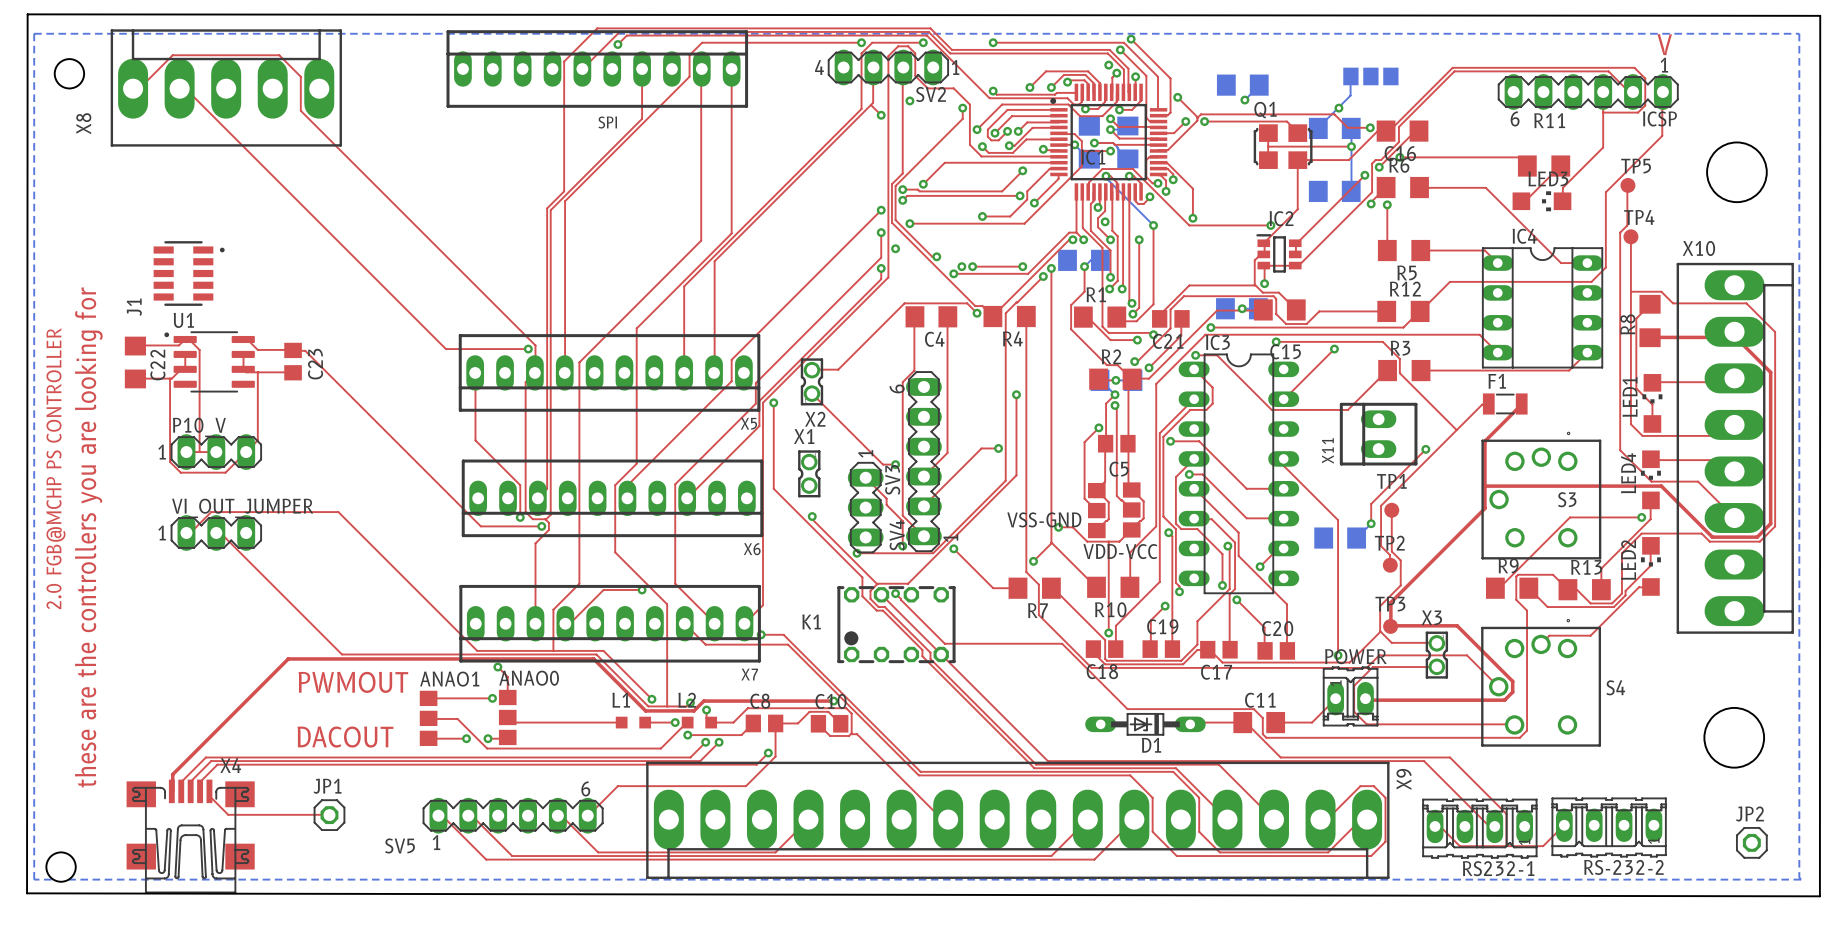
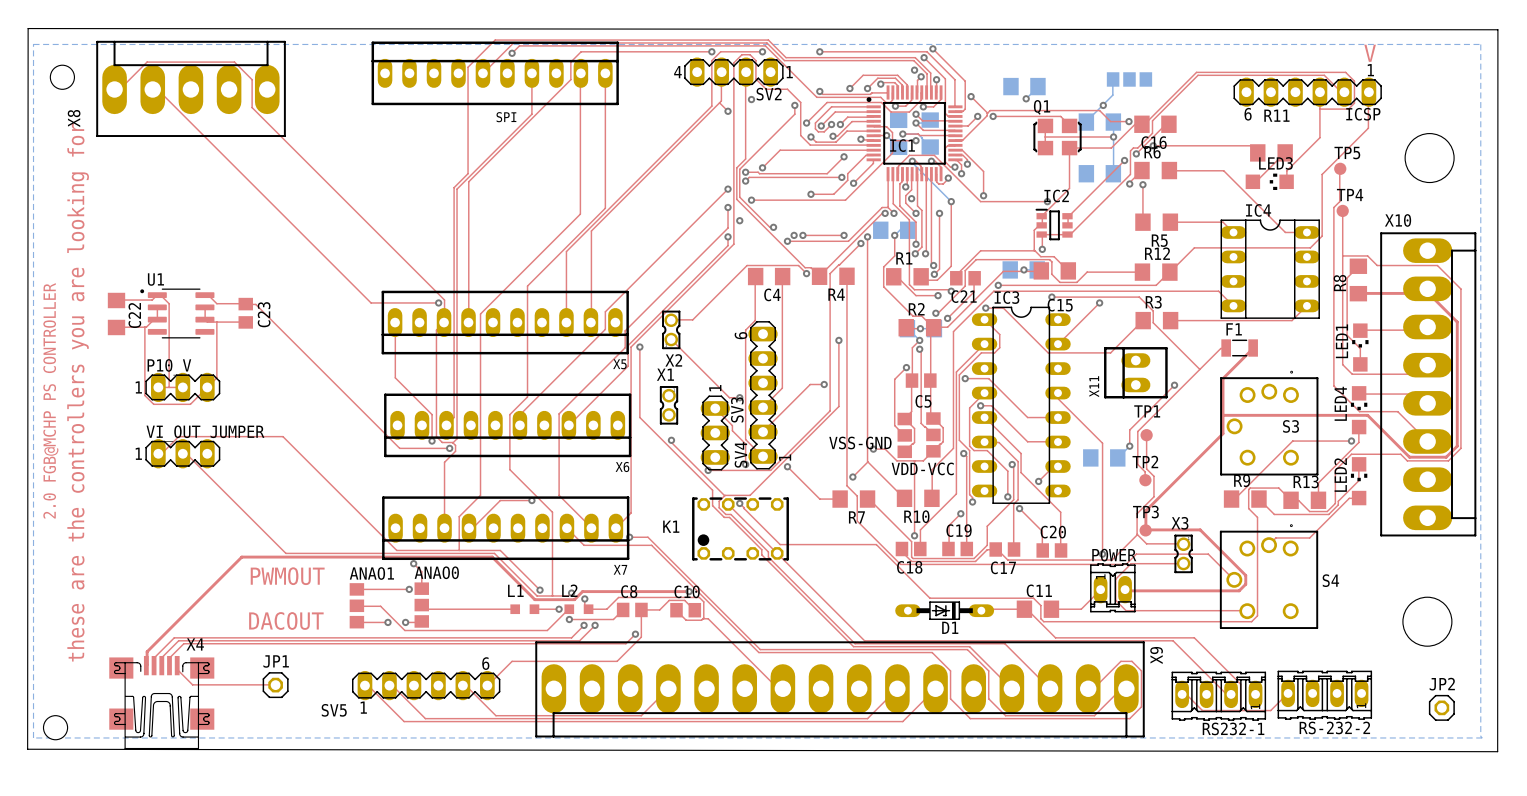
J1: (189, 273) -> none

